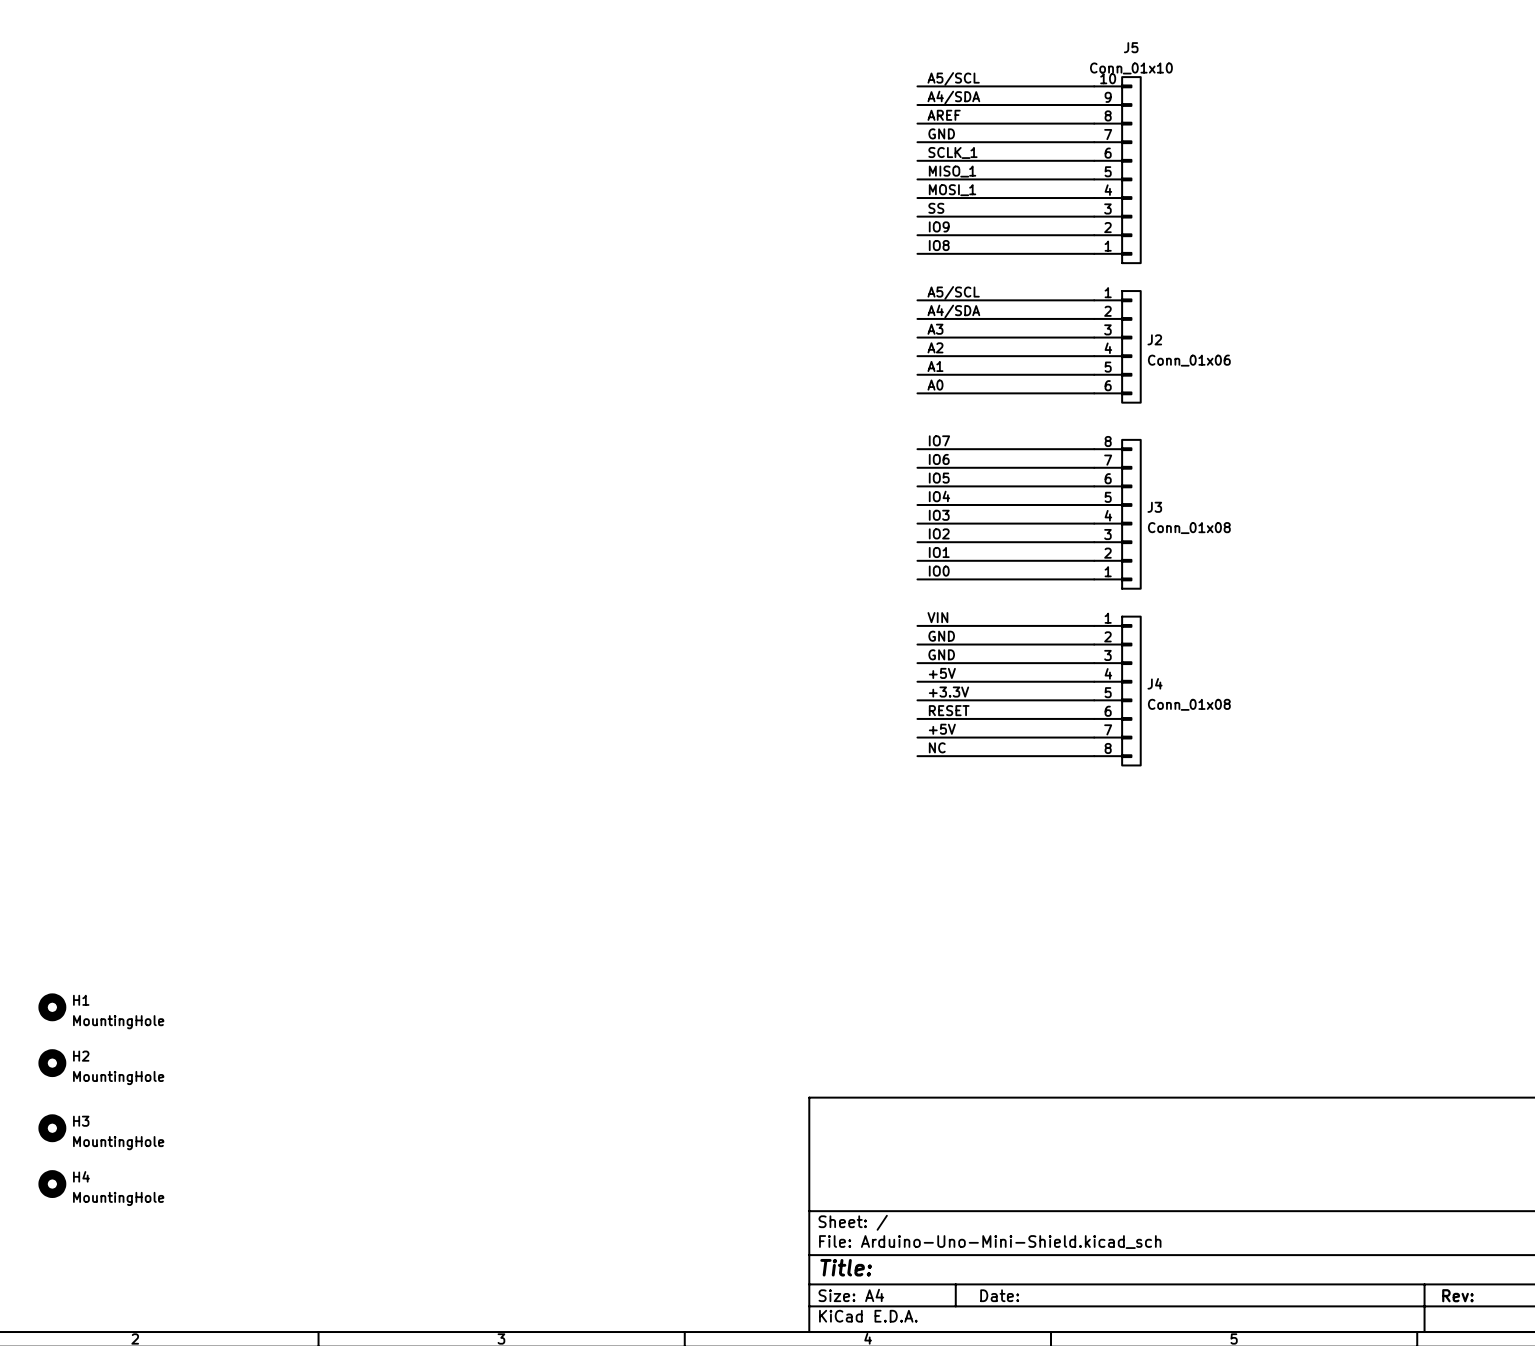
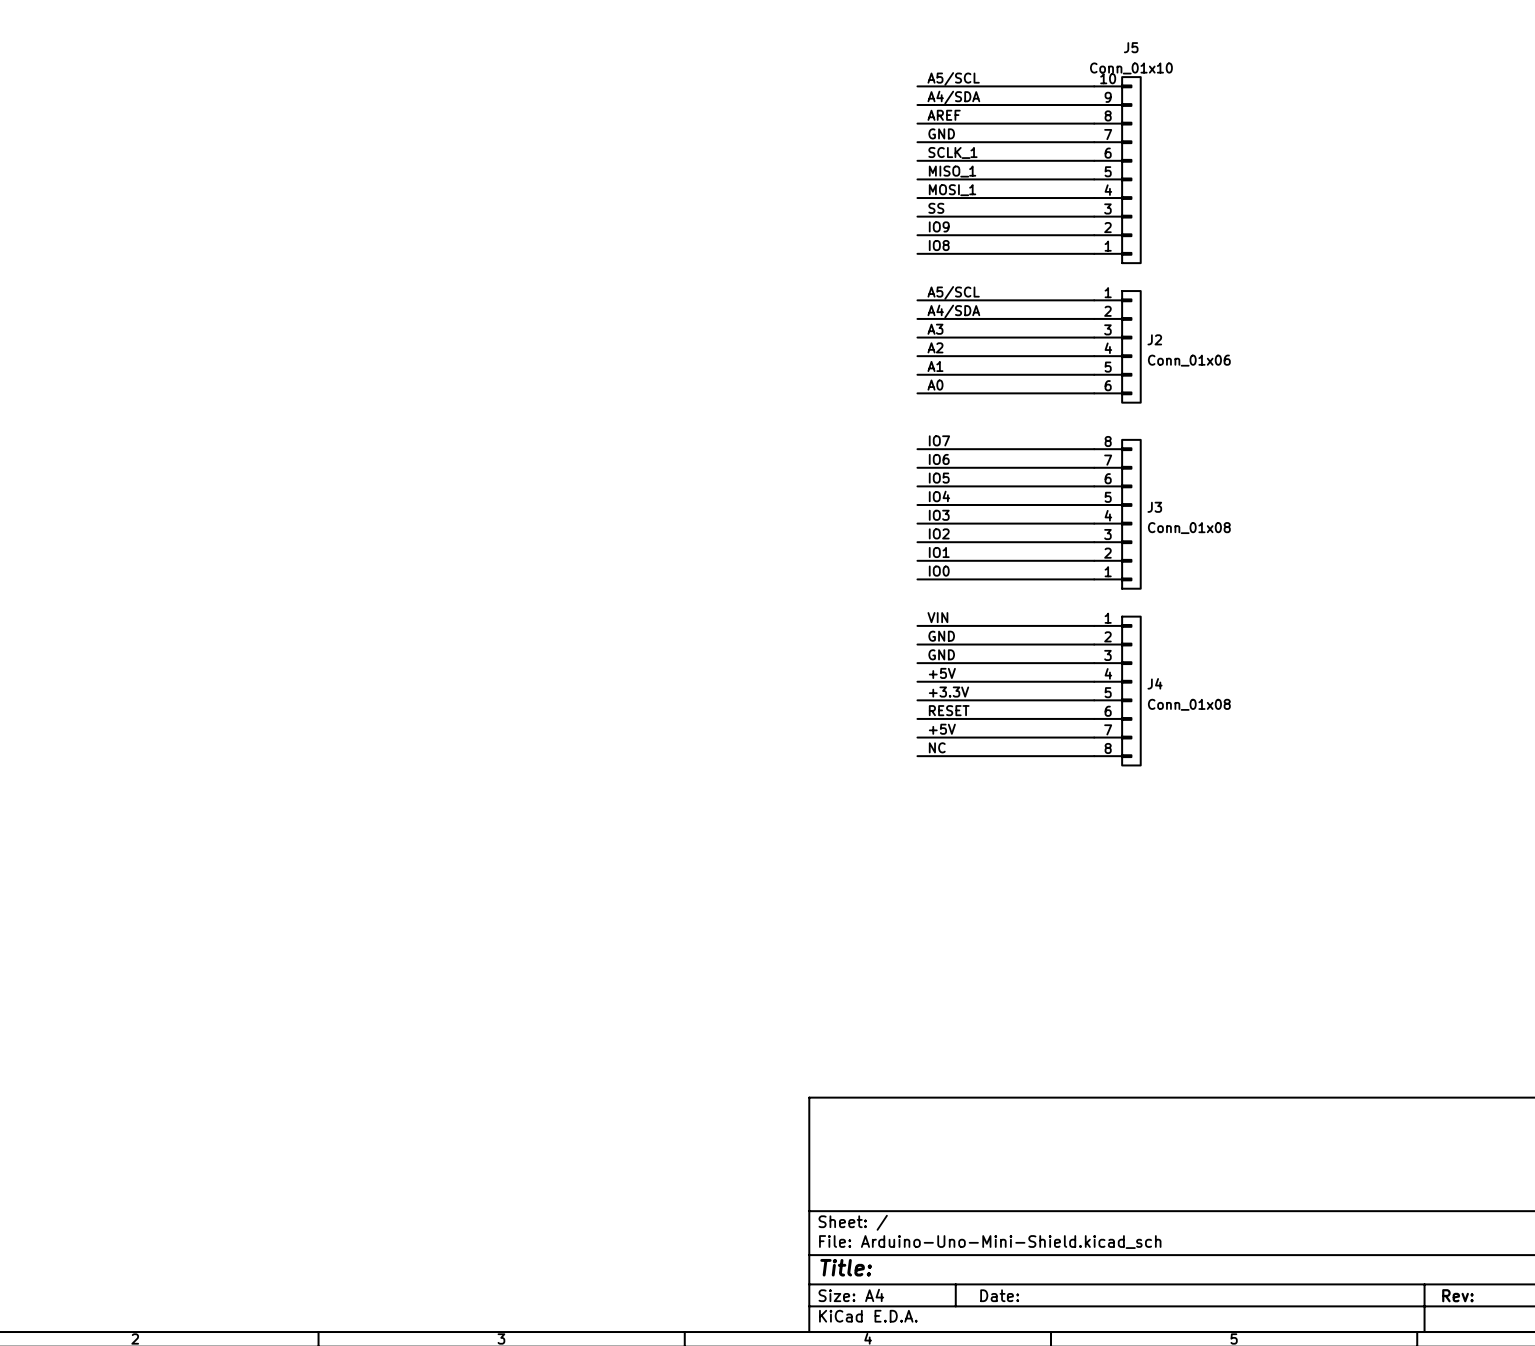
H1: MountingHole (52, 1007) -> none
H2: MountingHole (52, 1063) -> none
H3: MountingHole (52, 1128) -> none
H4: MountingHole (52, 1184) -> none

